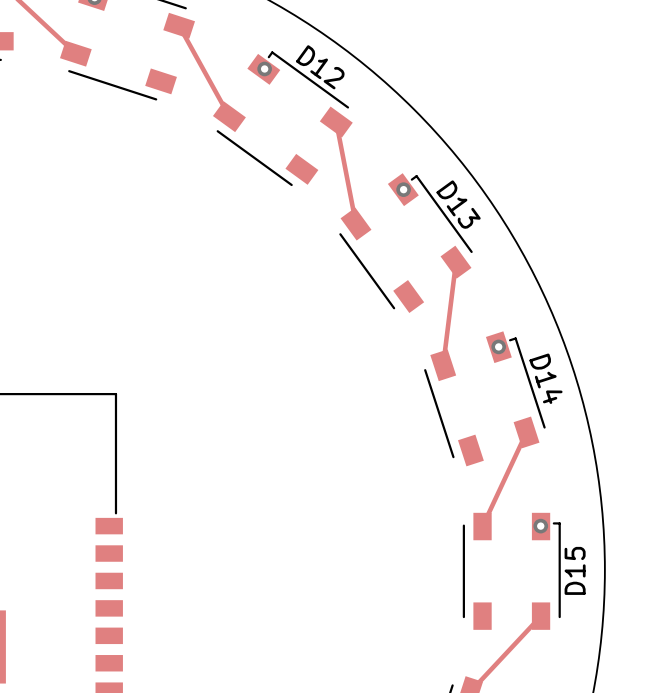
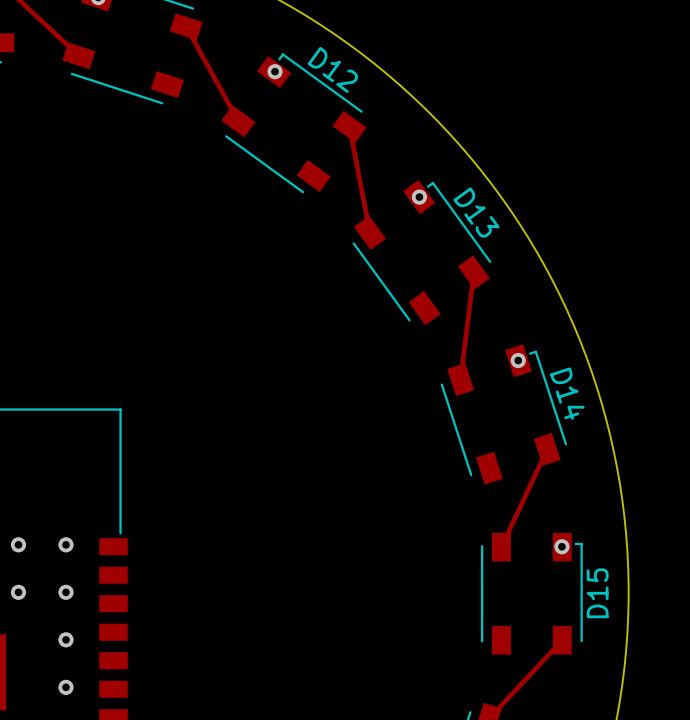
via: none -> (18, 544)
via: none -> (66, 544)
via: none -> (18, 592)
via: none -> (66, 592)
via: none -> (66, 639)
via: none -> (66, 687)

